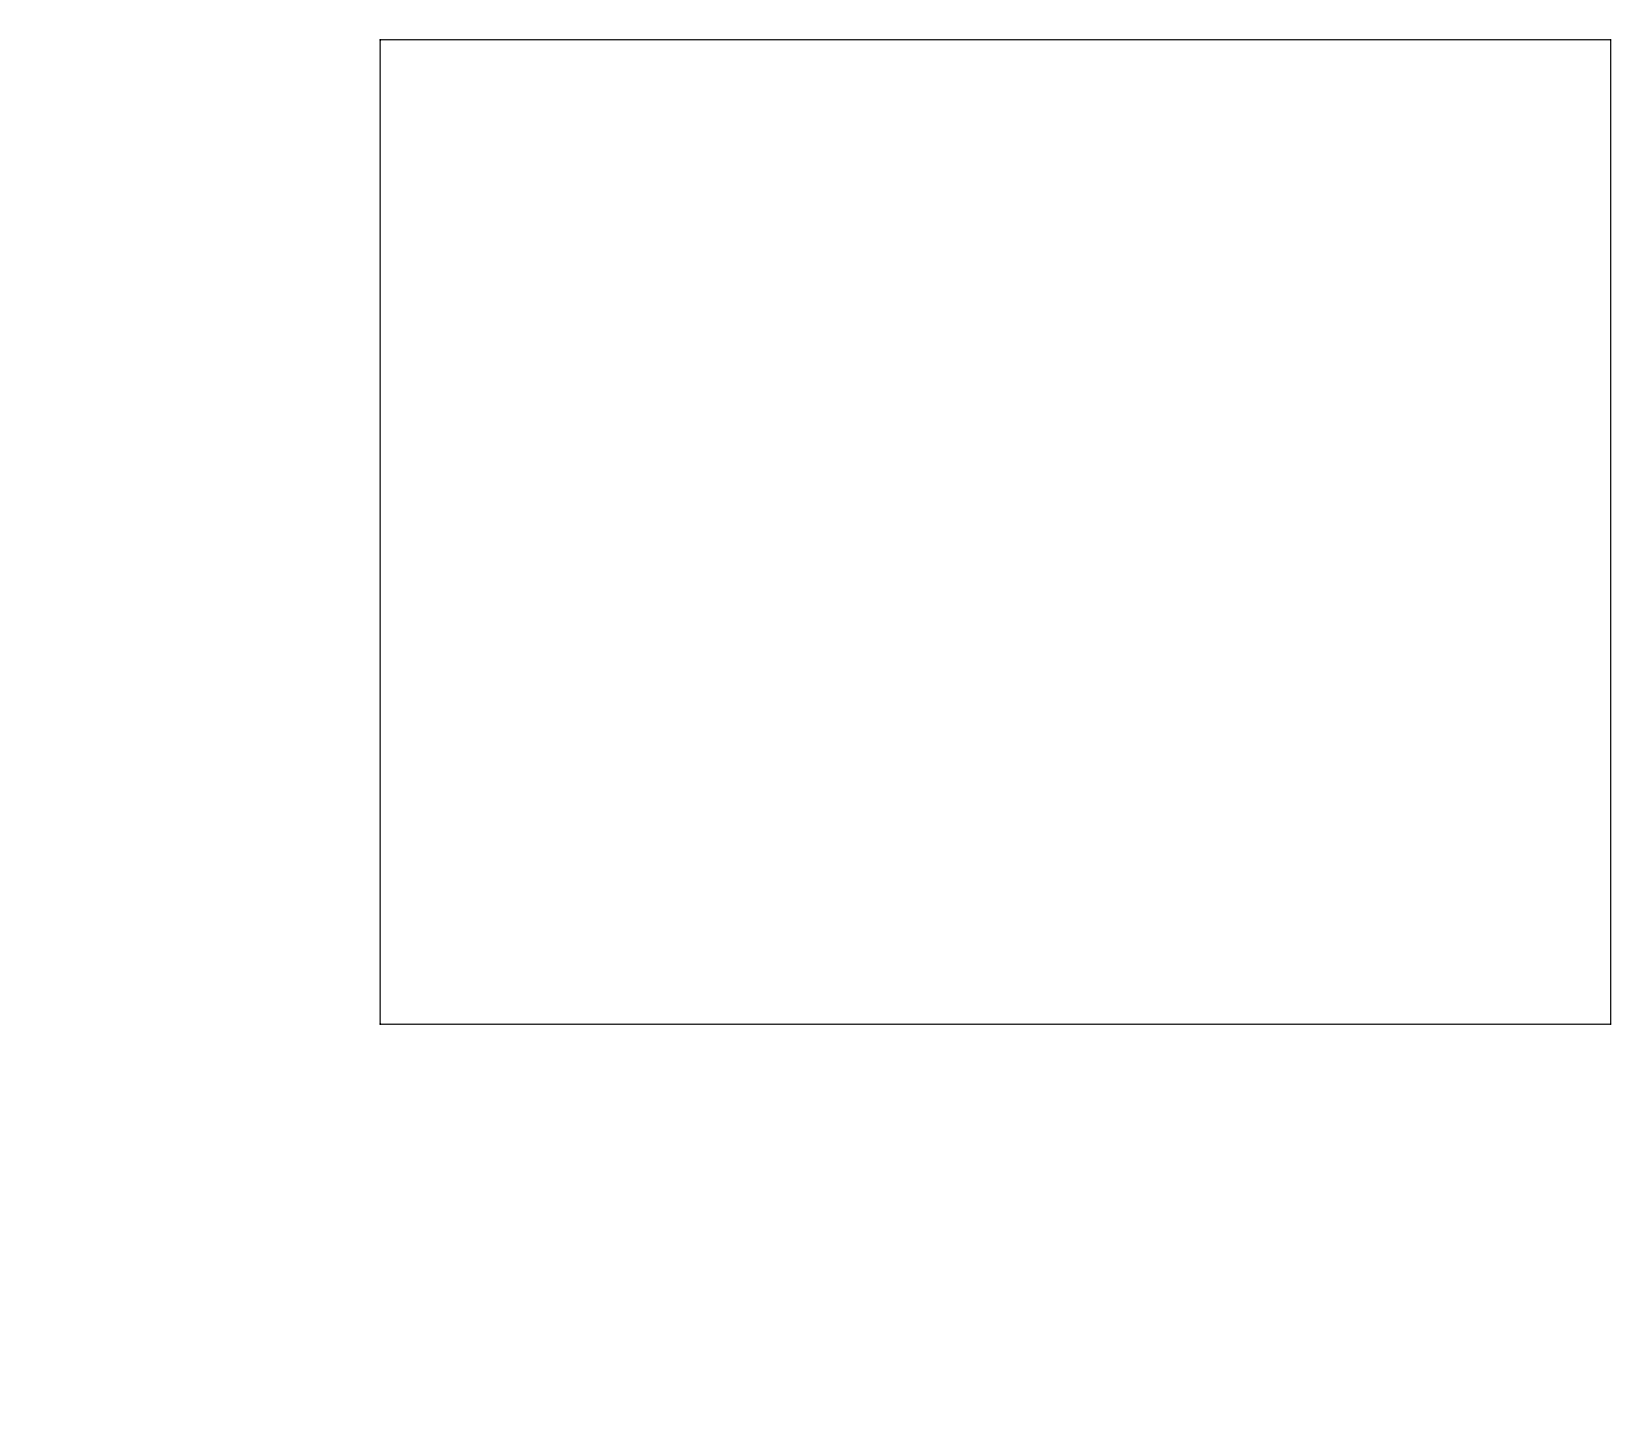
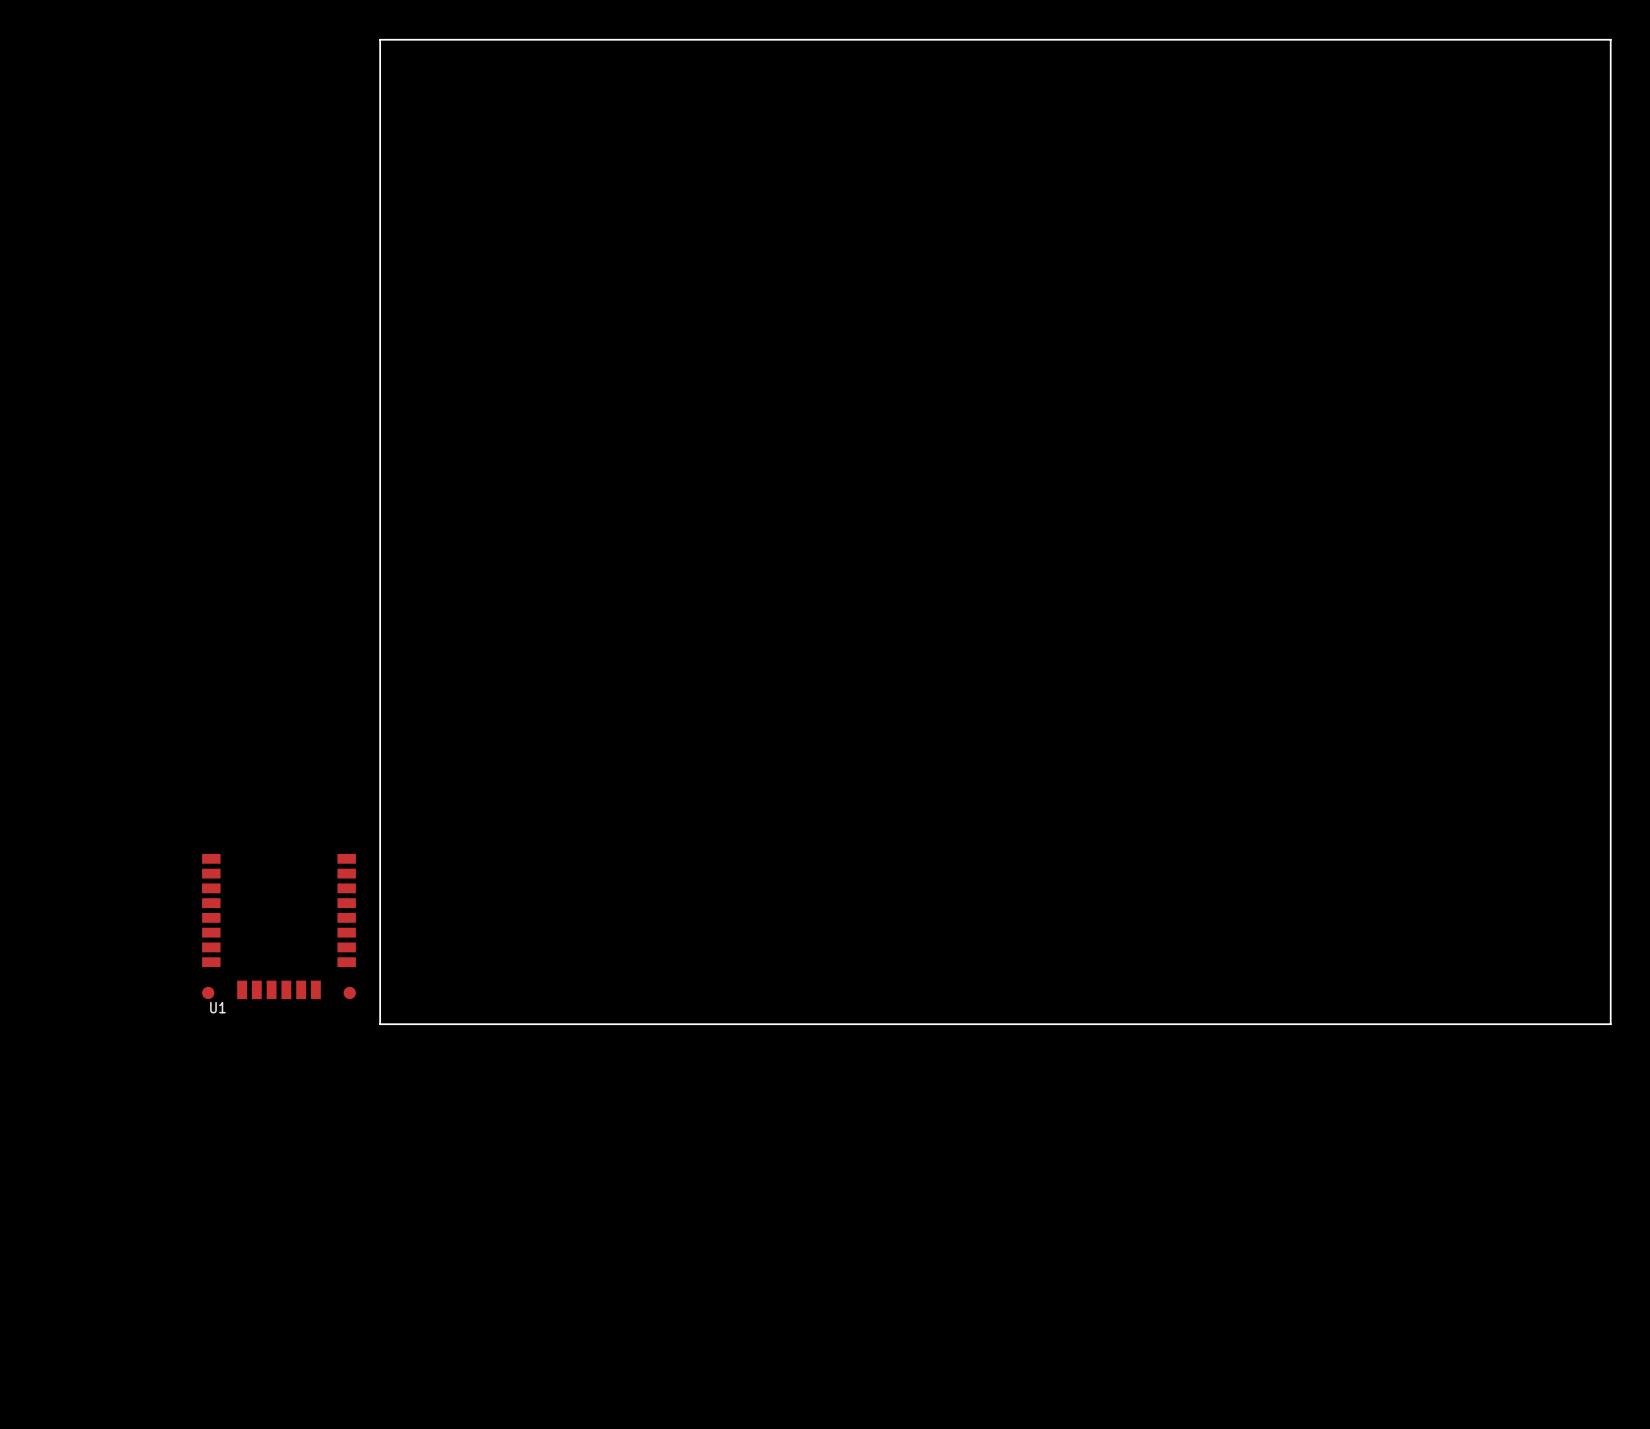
U1: none -> (278, 926)

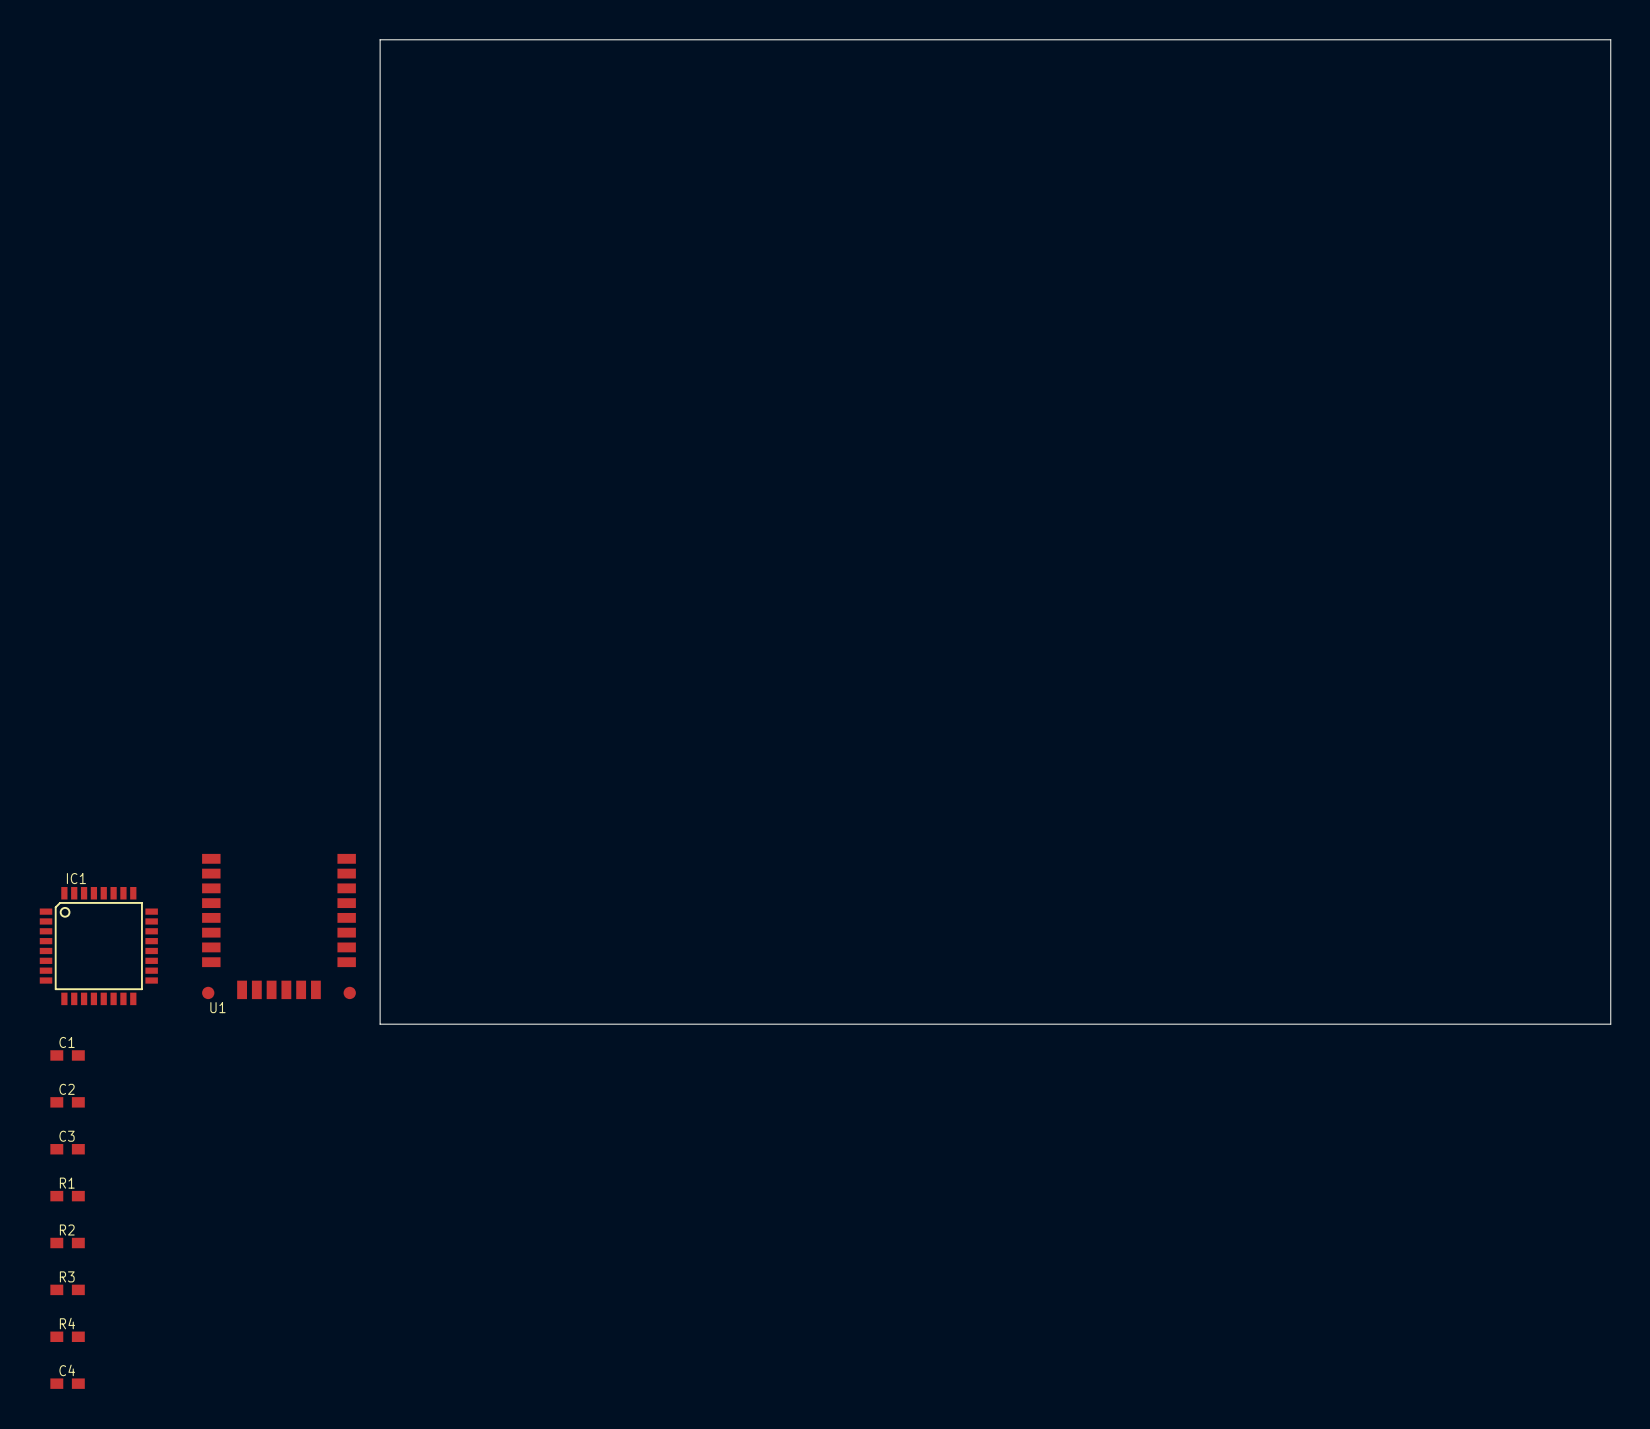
IC1: none -> (98, 946)
C1: none -> (67, 1055)
C2: none -> (67, 1102)
C3: none -> (67, 1149)
R1: none -> (67, 1196)
R2: none -> (67, 1243)
R3: none -> (67, 1289)
R4: none -> (67, 1336)
C4: none -> (67, 1383)

